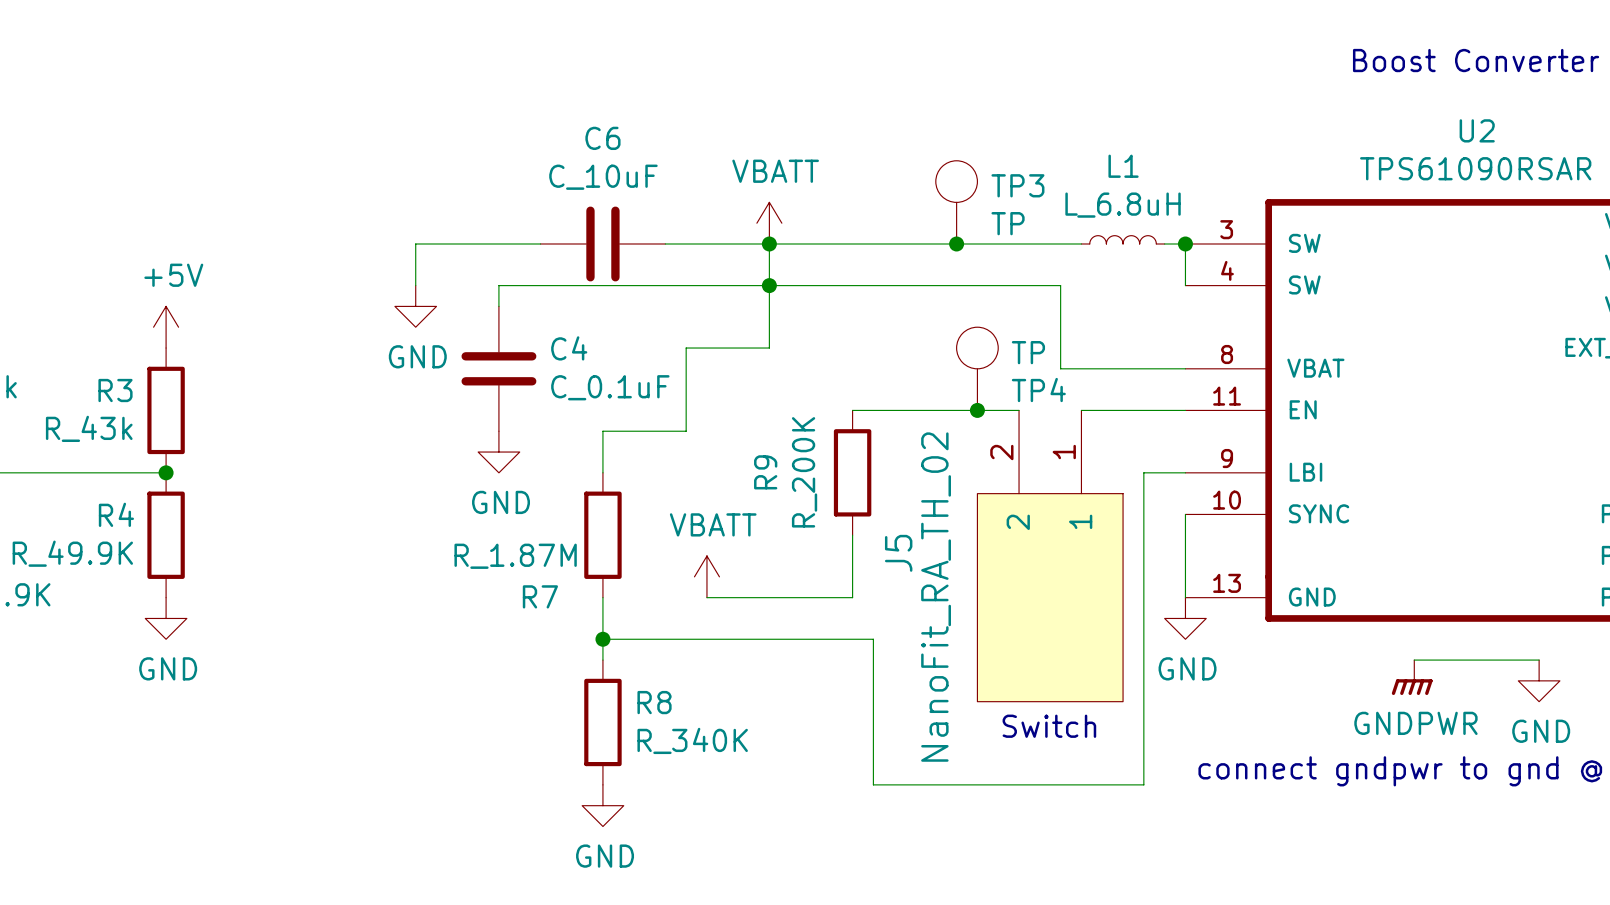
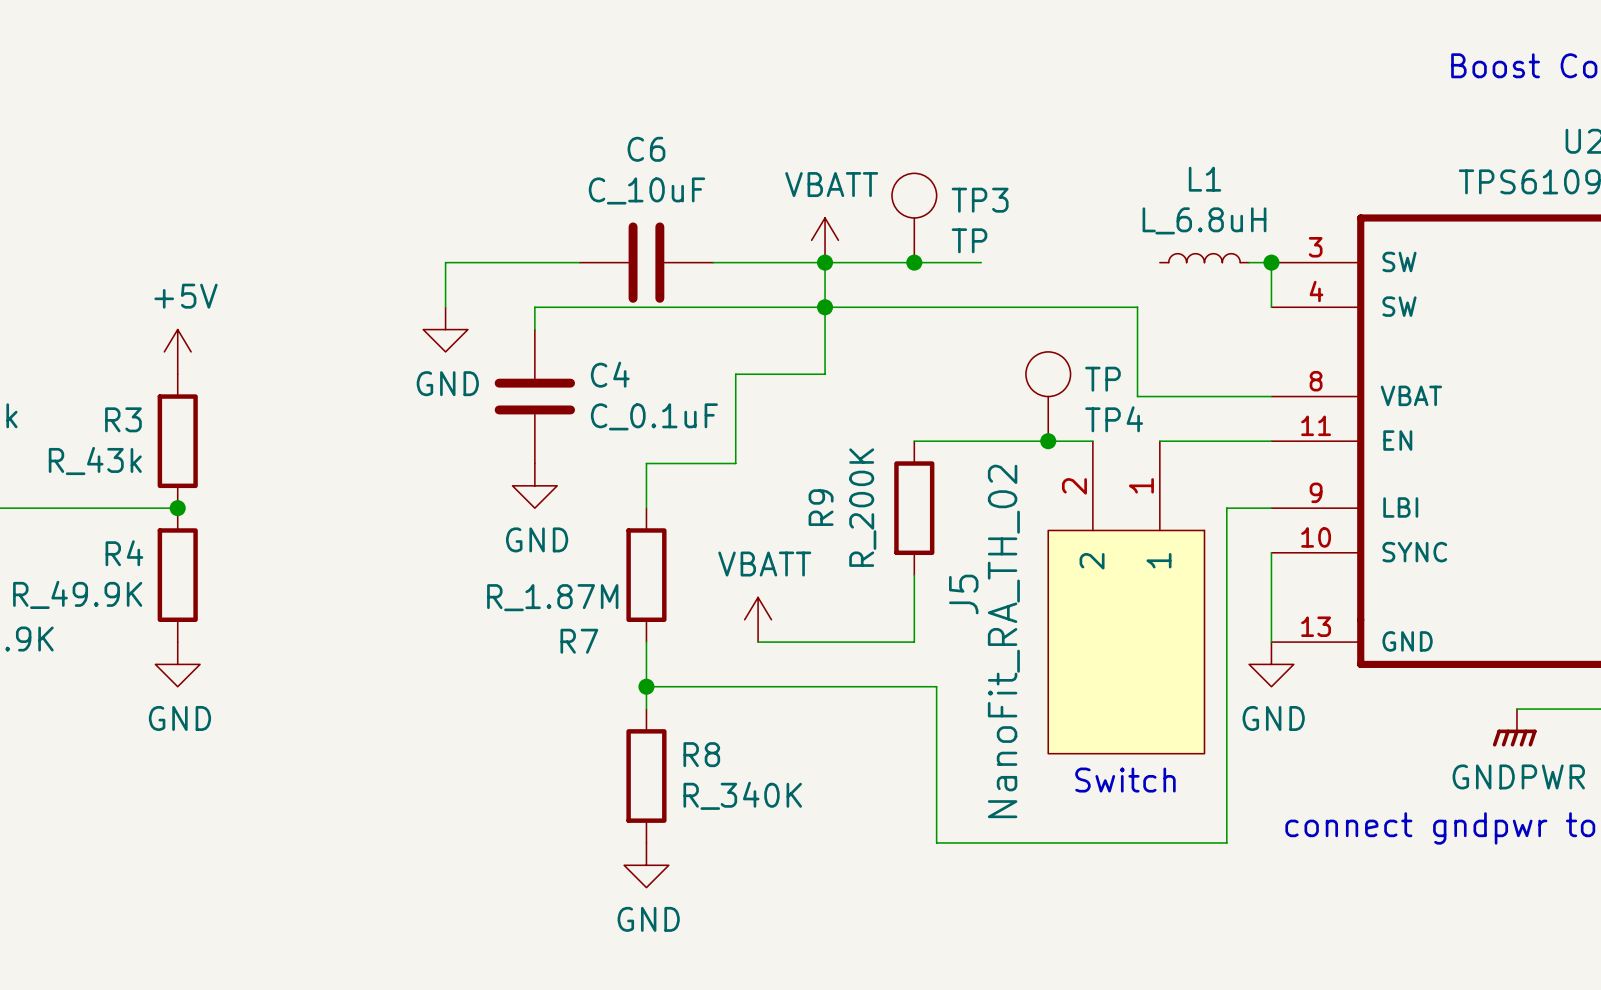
TP3 position: (956, 202) -> (914, 217)
junction: none -> (914, 262)
wire: (915, 243) (1081, 243) -> none
junction: (956, 243) -> none

